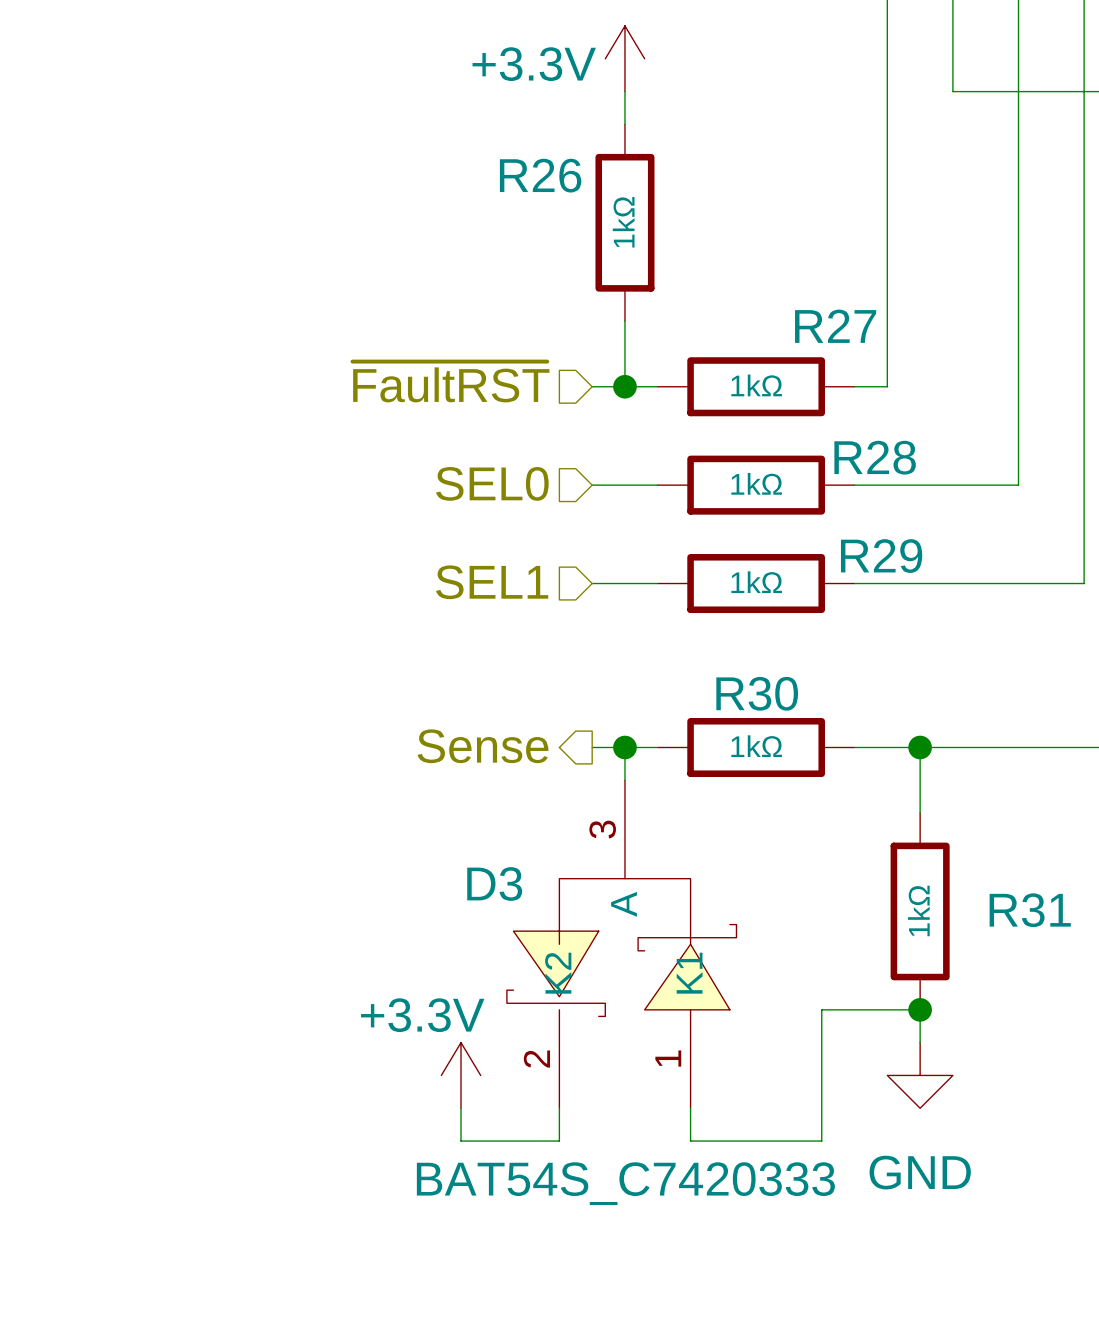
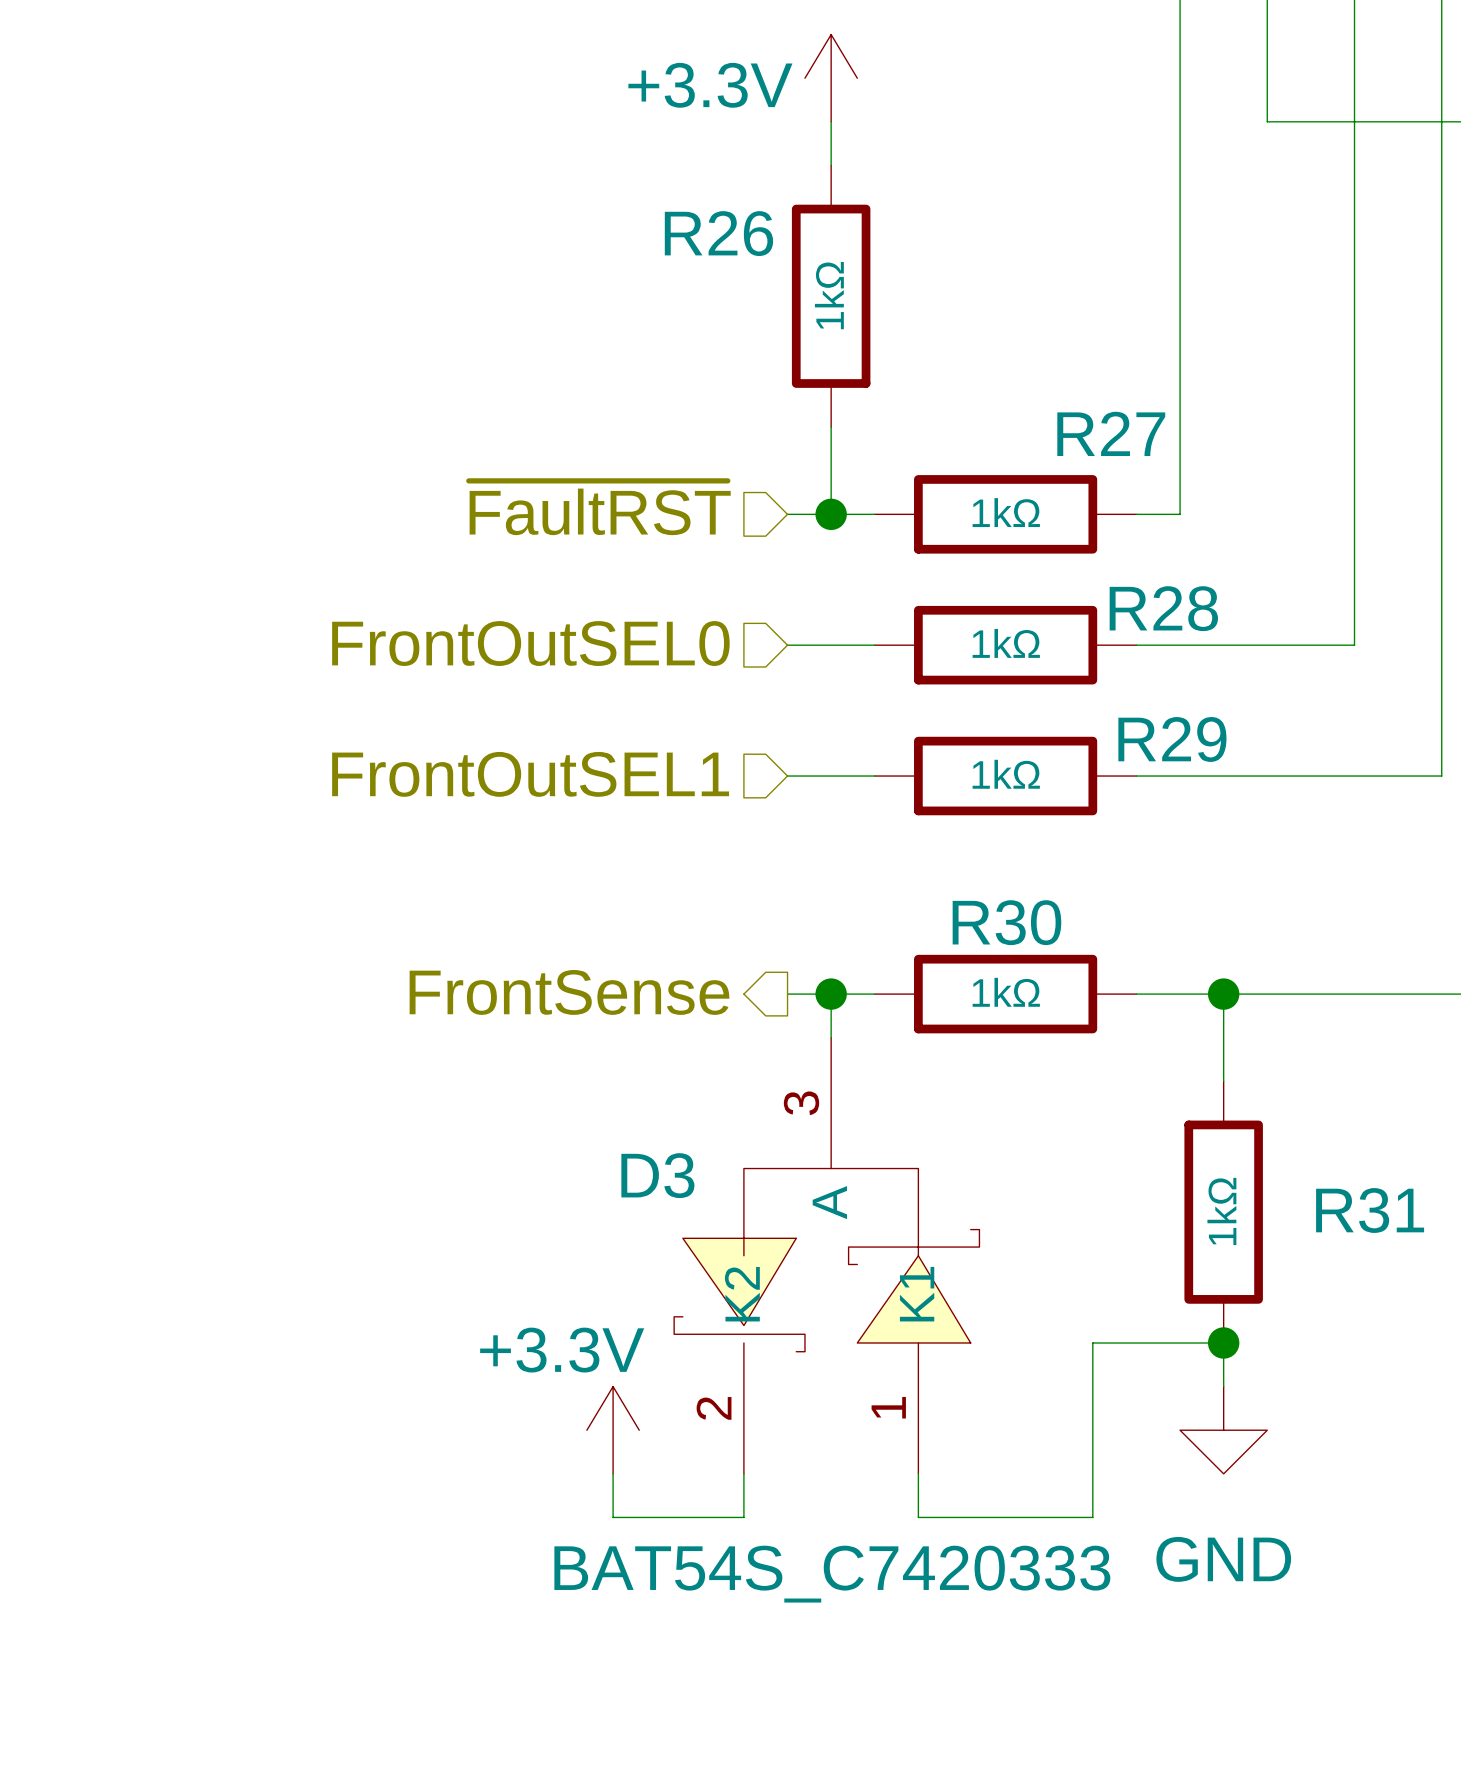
hierarchical label: SEL0 (492, 483) -> FrontOutSEL0 (530, 643)
hierarchical label: SEL1 (492, 582) -> FrontOutSEL1 (530, 774)
hierarchical label: Sense (482, 746) -> FrontSense (569, 992)

